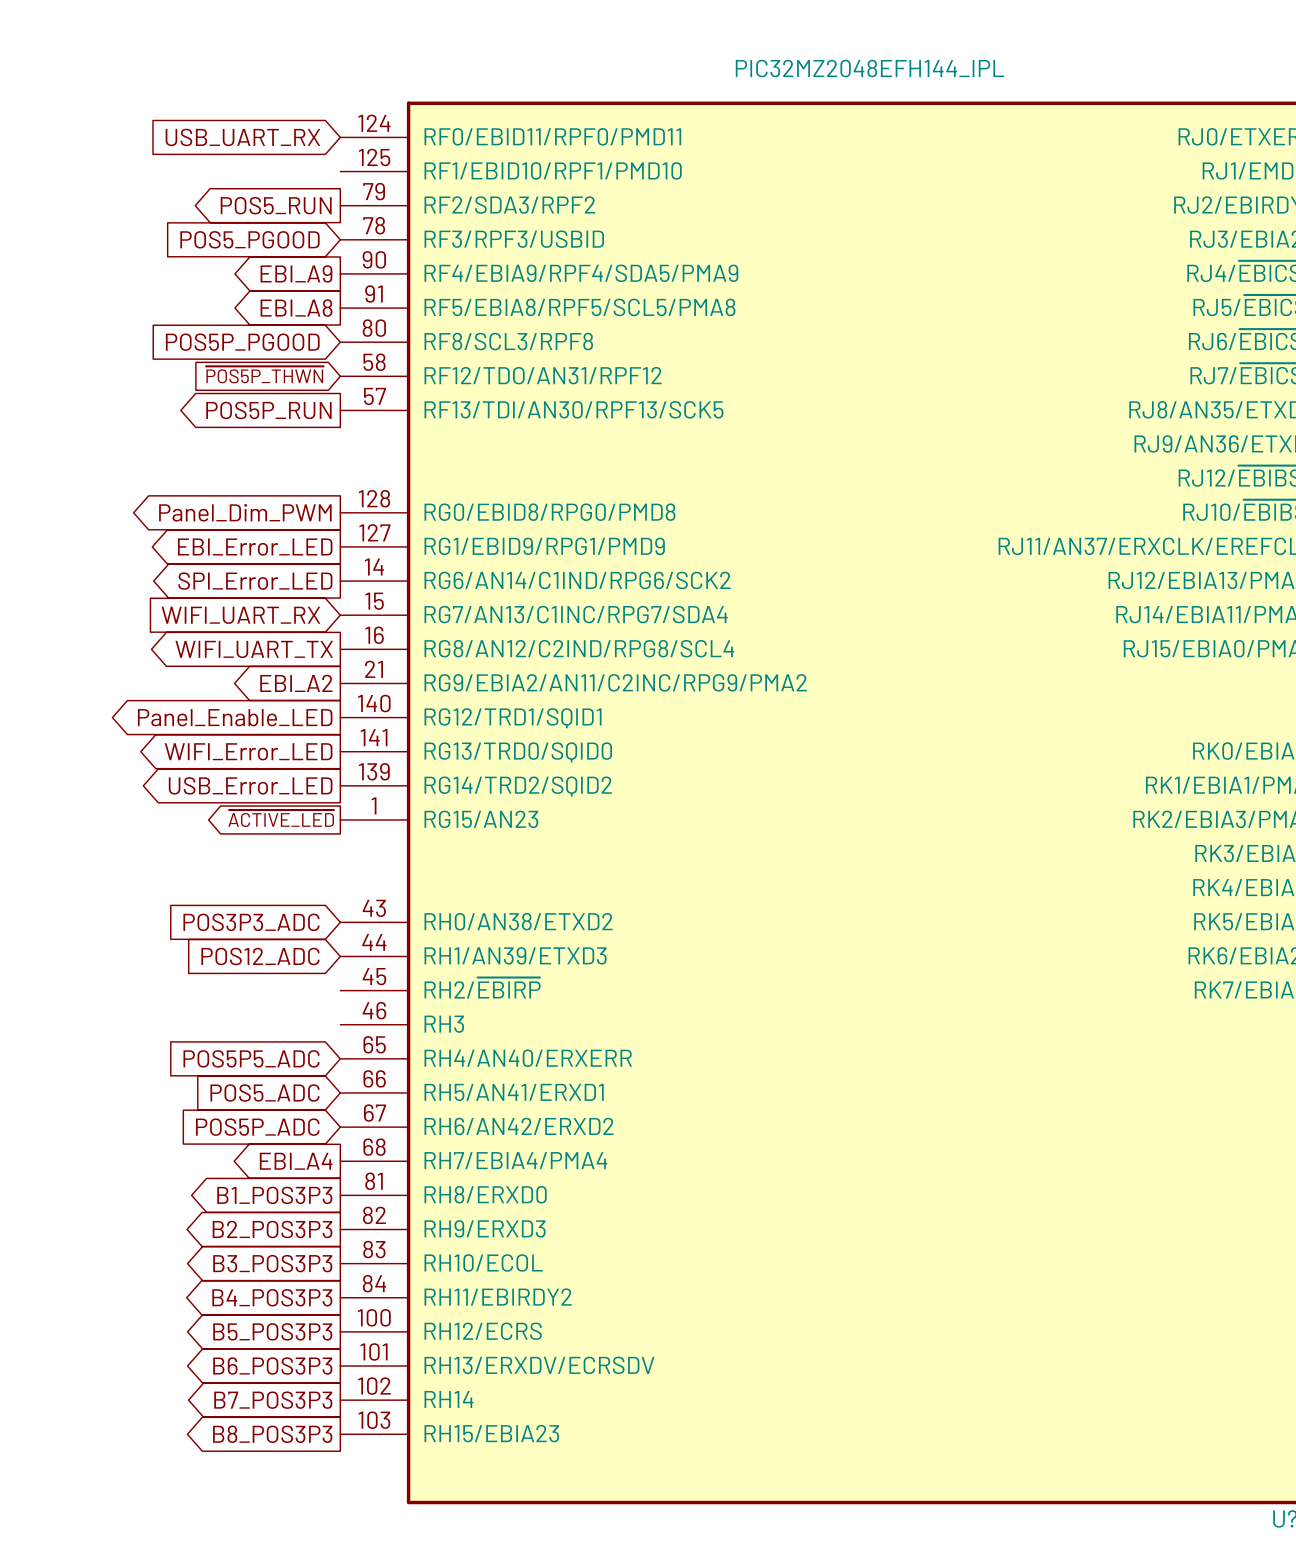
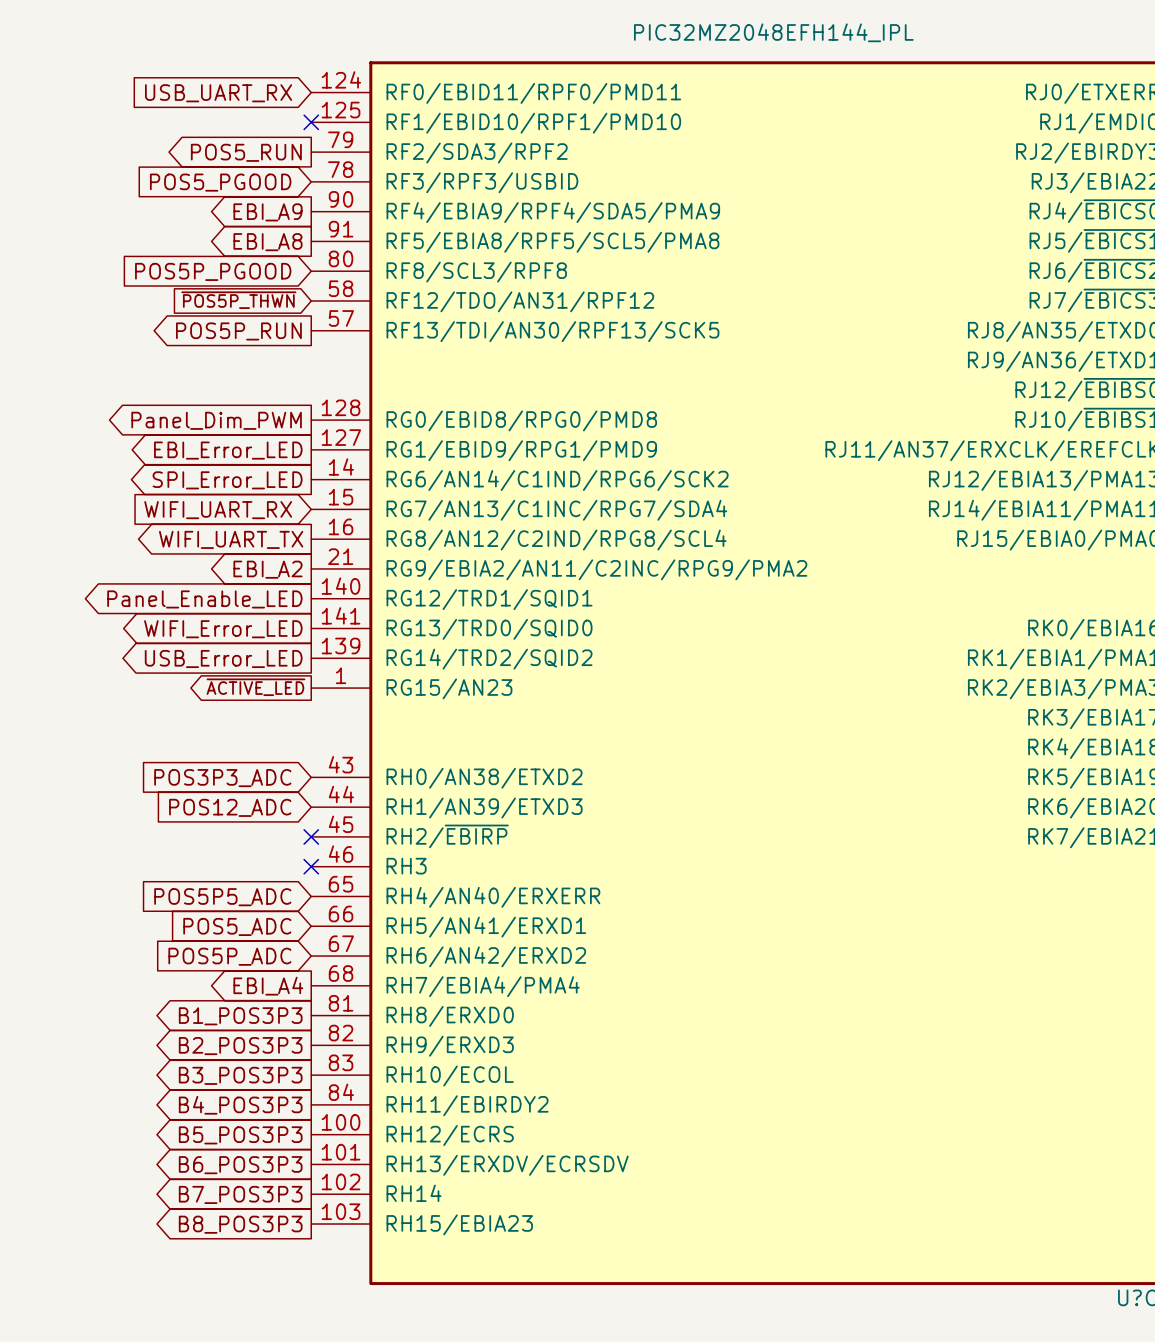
no-connect mark: none -> (311, 122)
no-connect mark: none -> (311, 836)
no-connect mark: none -> (311, 866)

